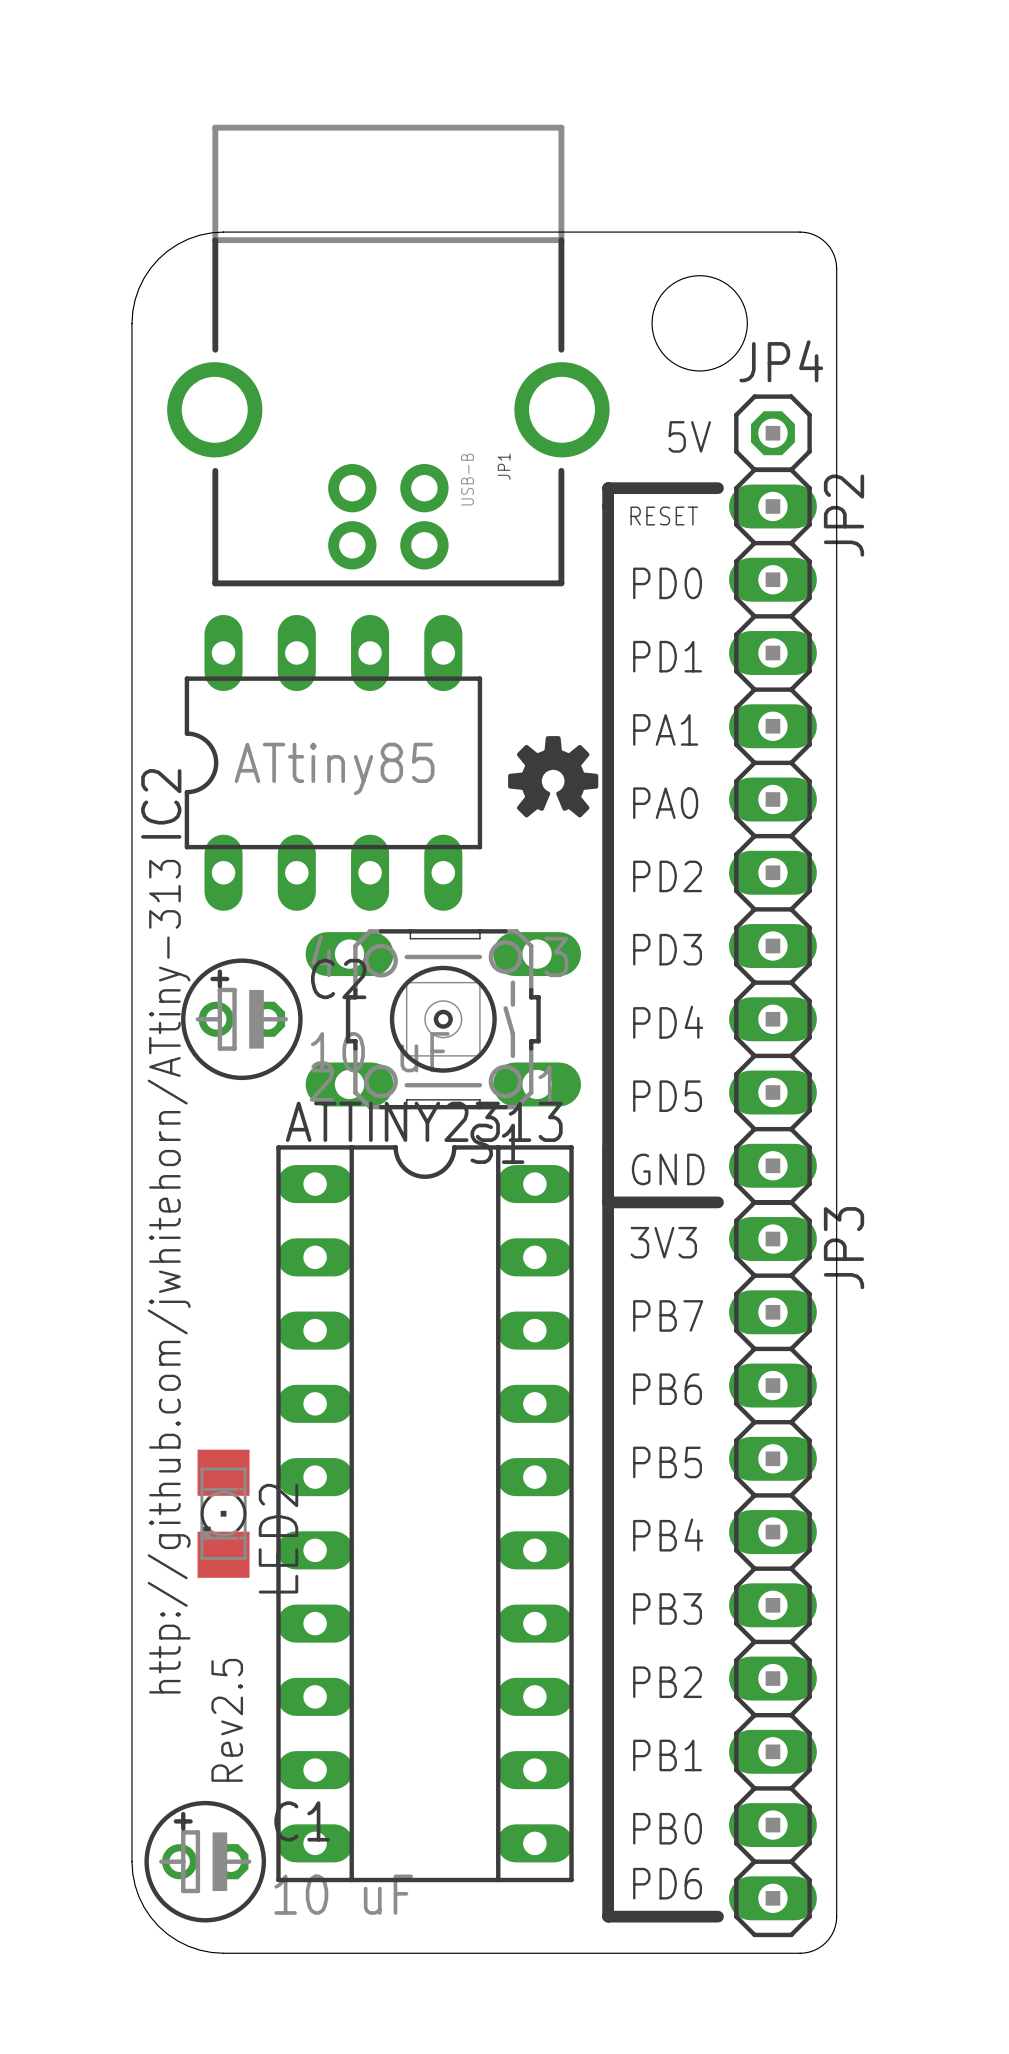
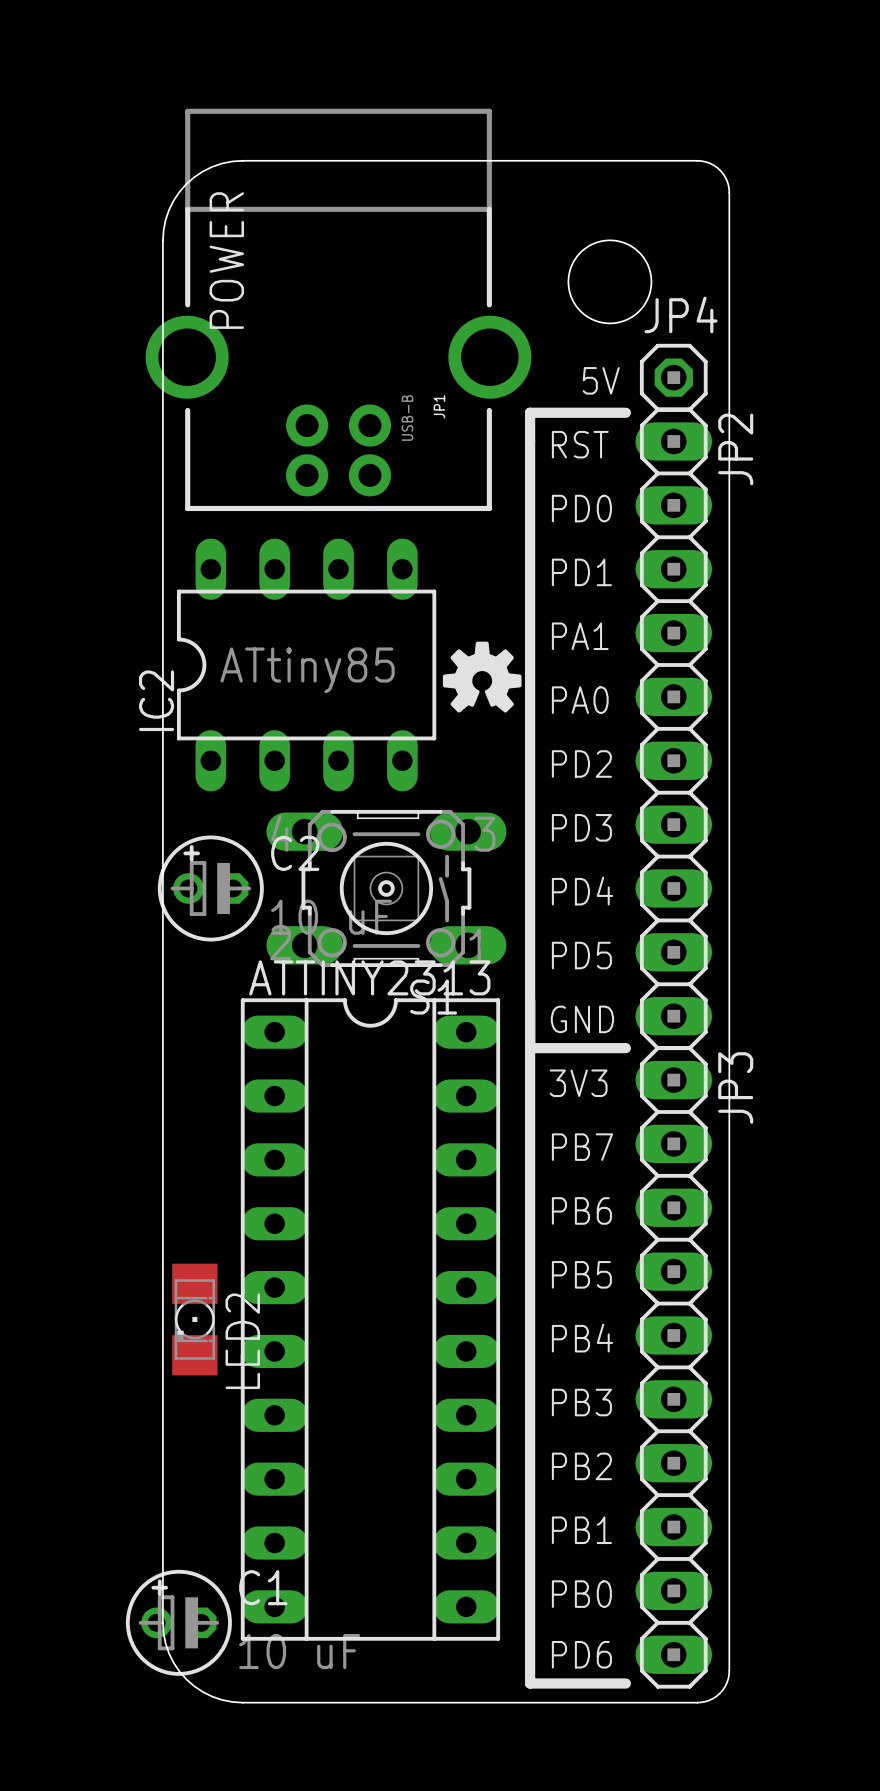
board edge: (836, 268) (833, 254) (825, 242) (814, 234) (800, 232) (223, 232) (199, 235) (177, 244) (167, 250) (150, 267) (144, 277) (135, 299) (131, 323) (132, 1873) (138, 1896) (150, 1917) (158, 1926) (177, 1940) (199, 1950) (211, 1952) (278, 1953) -> (729, 234) (729, 192) (726, 180) (722, 173) (713, 165) (697, 160) (232, 161) (212, 166) (186, 184) (173, 200) (165, 219) (162, 240) (162, 1622) (169, 1653) (186, 1679) (212, 1696) (242, 1702)
text: none -> POWER (226, 260)
line: (608, 488) (718, 488) -> (530, 425) (530, 412) (625, 412)
text: RESET (664, 516) -> RST (580, 444)
IC2 footprint: [184, 614, 483, 911] -> [176, 538, 437, 792]
IC2 value position: ATtiny85 (334, 768) -> ATtiny85 (307, 670)
IC2 name position: IC2 (161, 803) -> IC2 (156, 700)
text: http://github.com/jwhitehorn/ATtiny-313 (169, 1276) -> none
text: Rev2.5 (227, 1720) -> none
text position: PD6 (667, 1883) -> PD6 (581, 1654)
line: (608, 1916) (718, 1916) -> (530, 1670) (530, 1683) (625, 1683)

